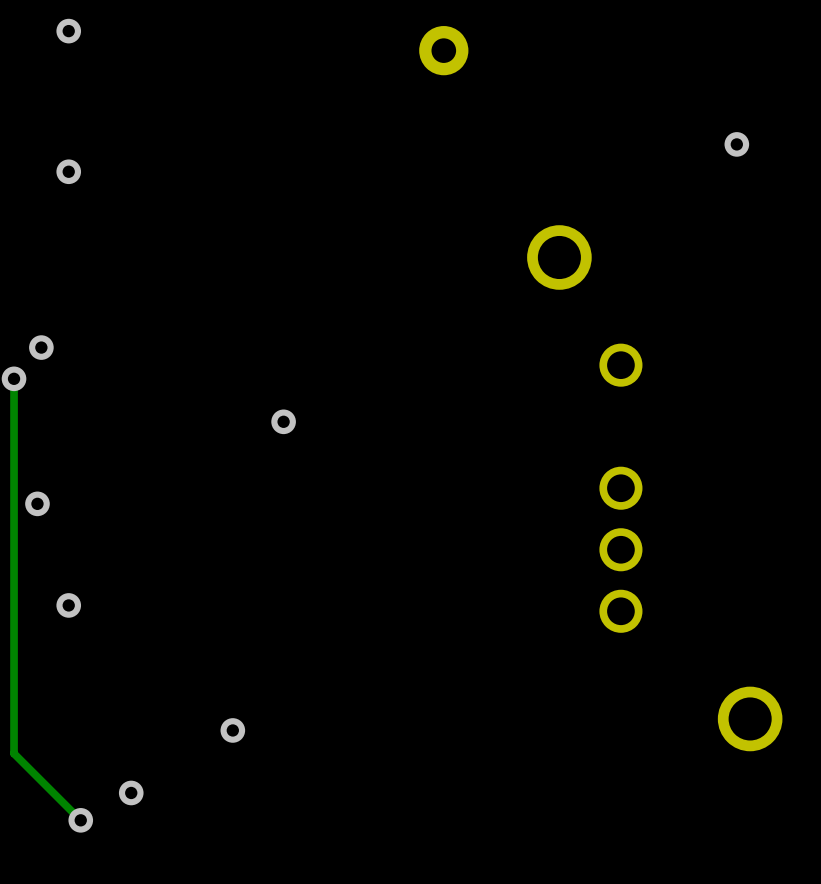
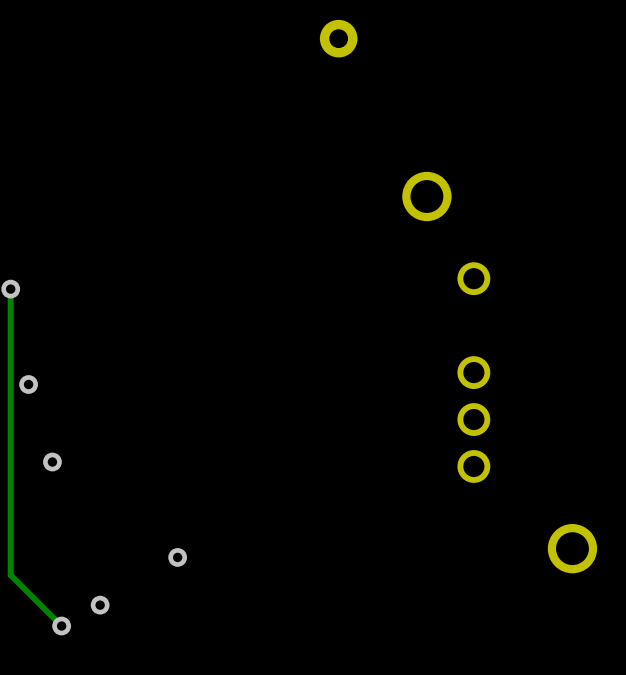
via: (68, 31) -> none
via: (736, 144) -> none
via: (68, 171) -> none
via: (41, 347) -> none
via: (283, 421) -> none

